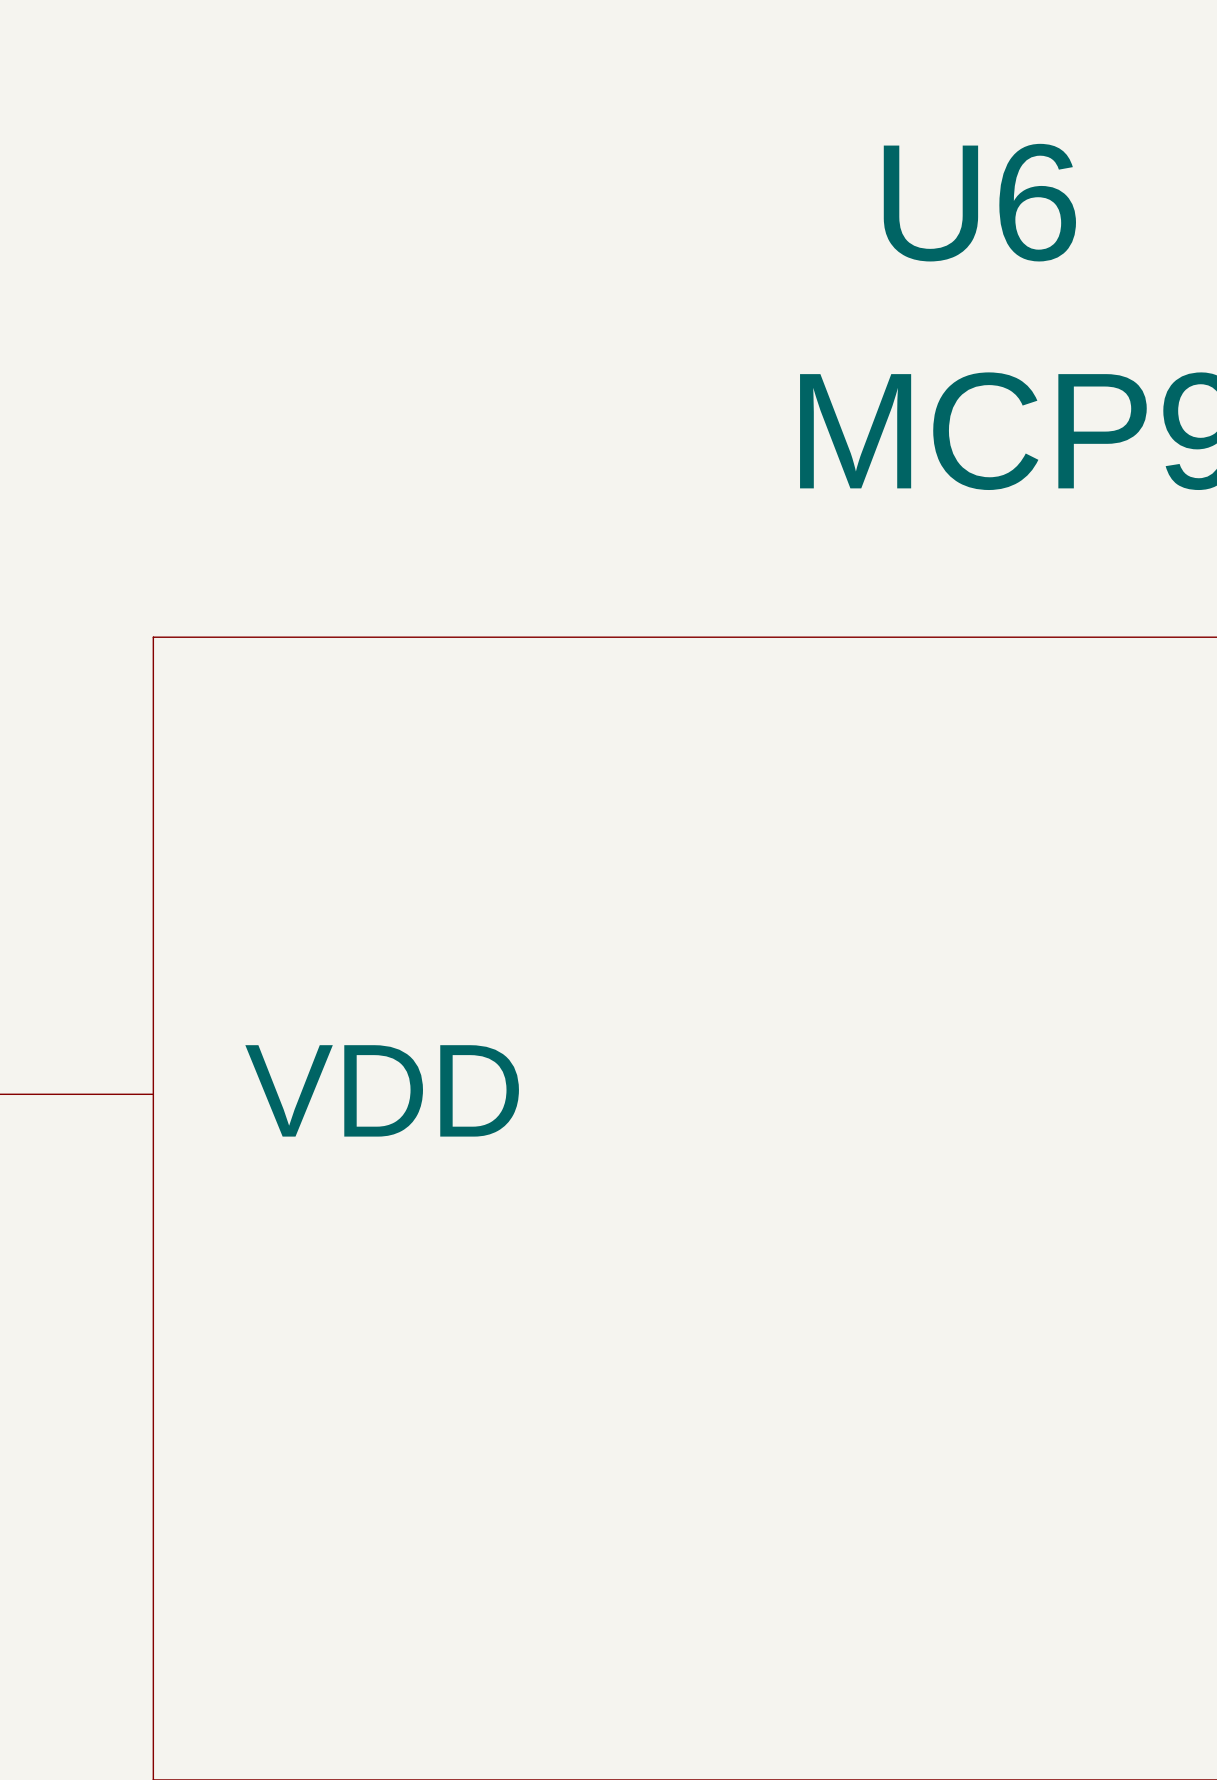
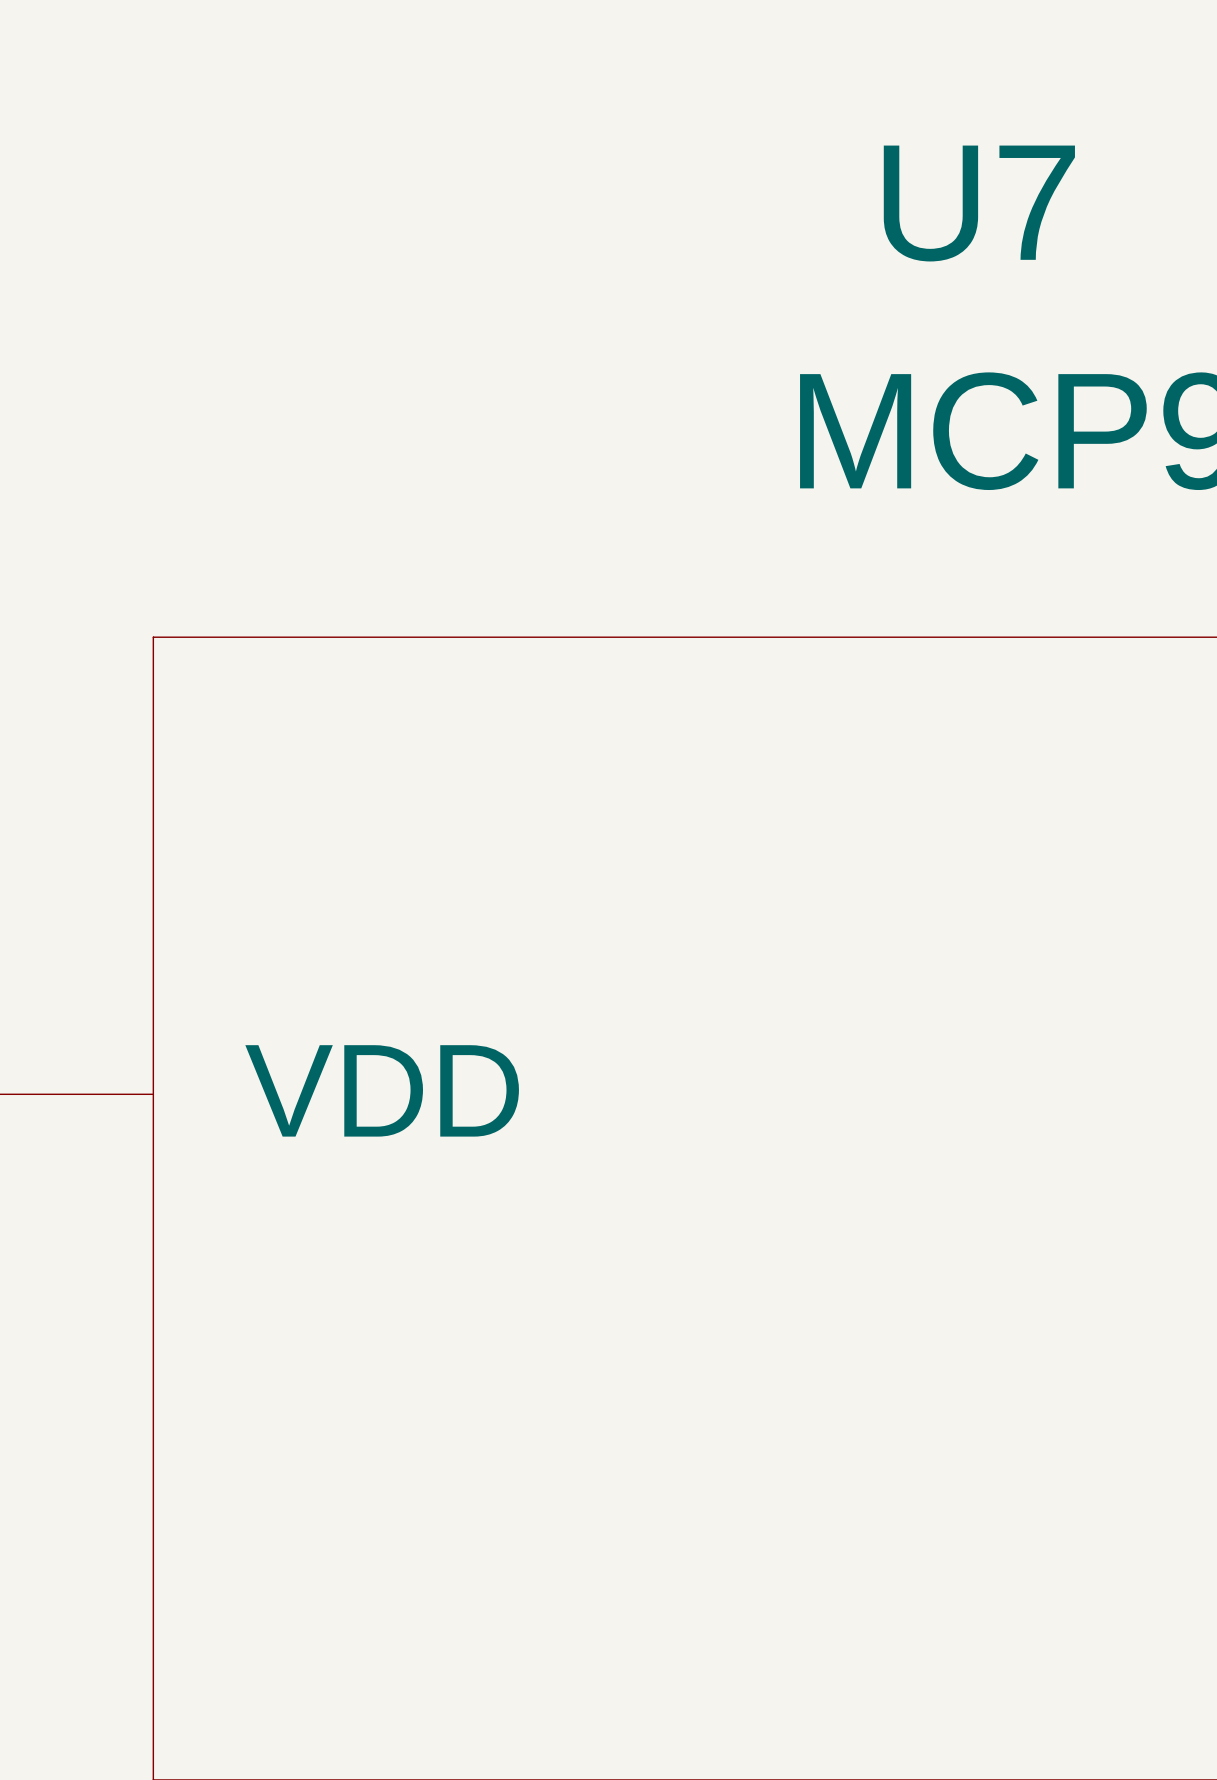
U6 name: U6 (979, 202) -> U7 (979, 203)

